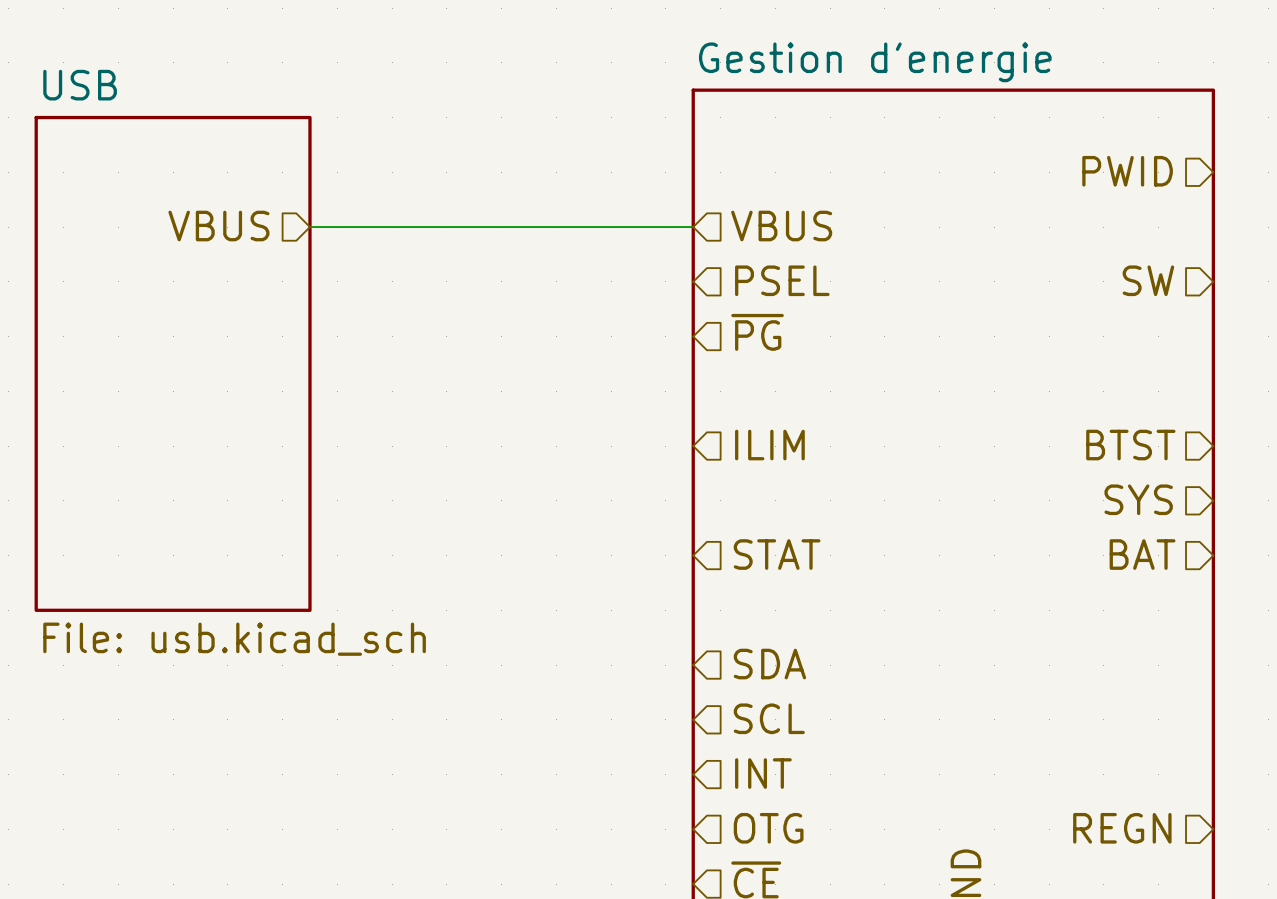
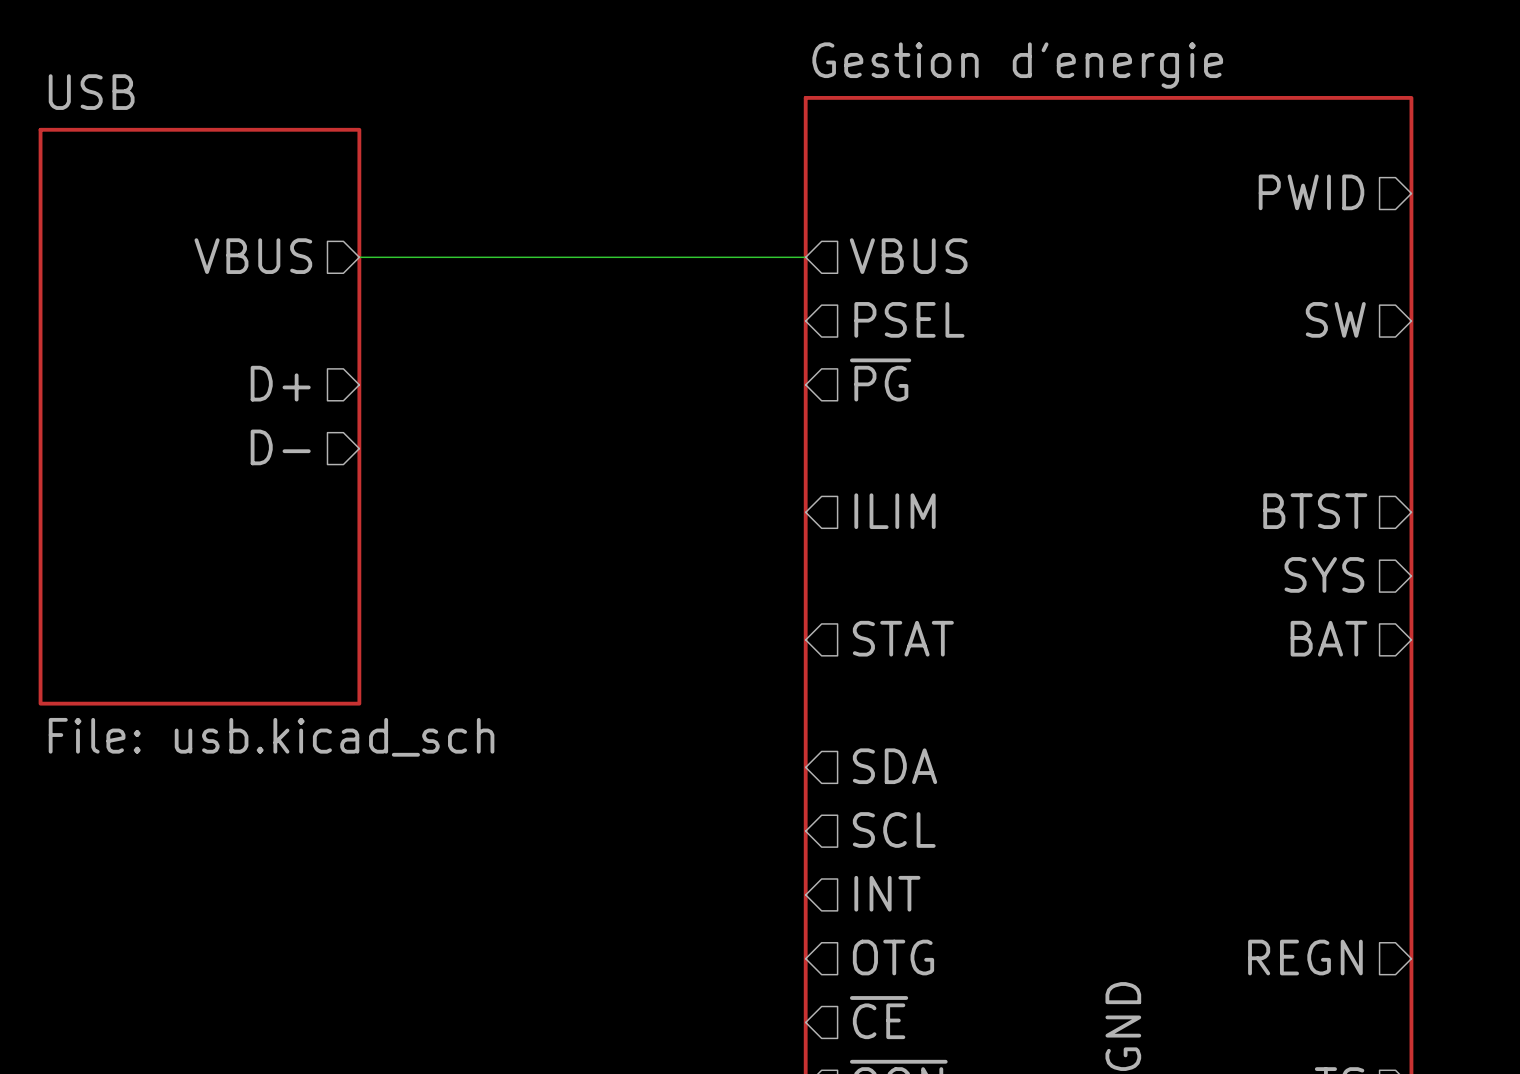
hierarchical label: none -> D+ (280, 383)
hierarchical label: none -> D- (280, 447)

